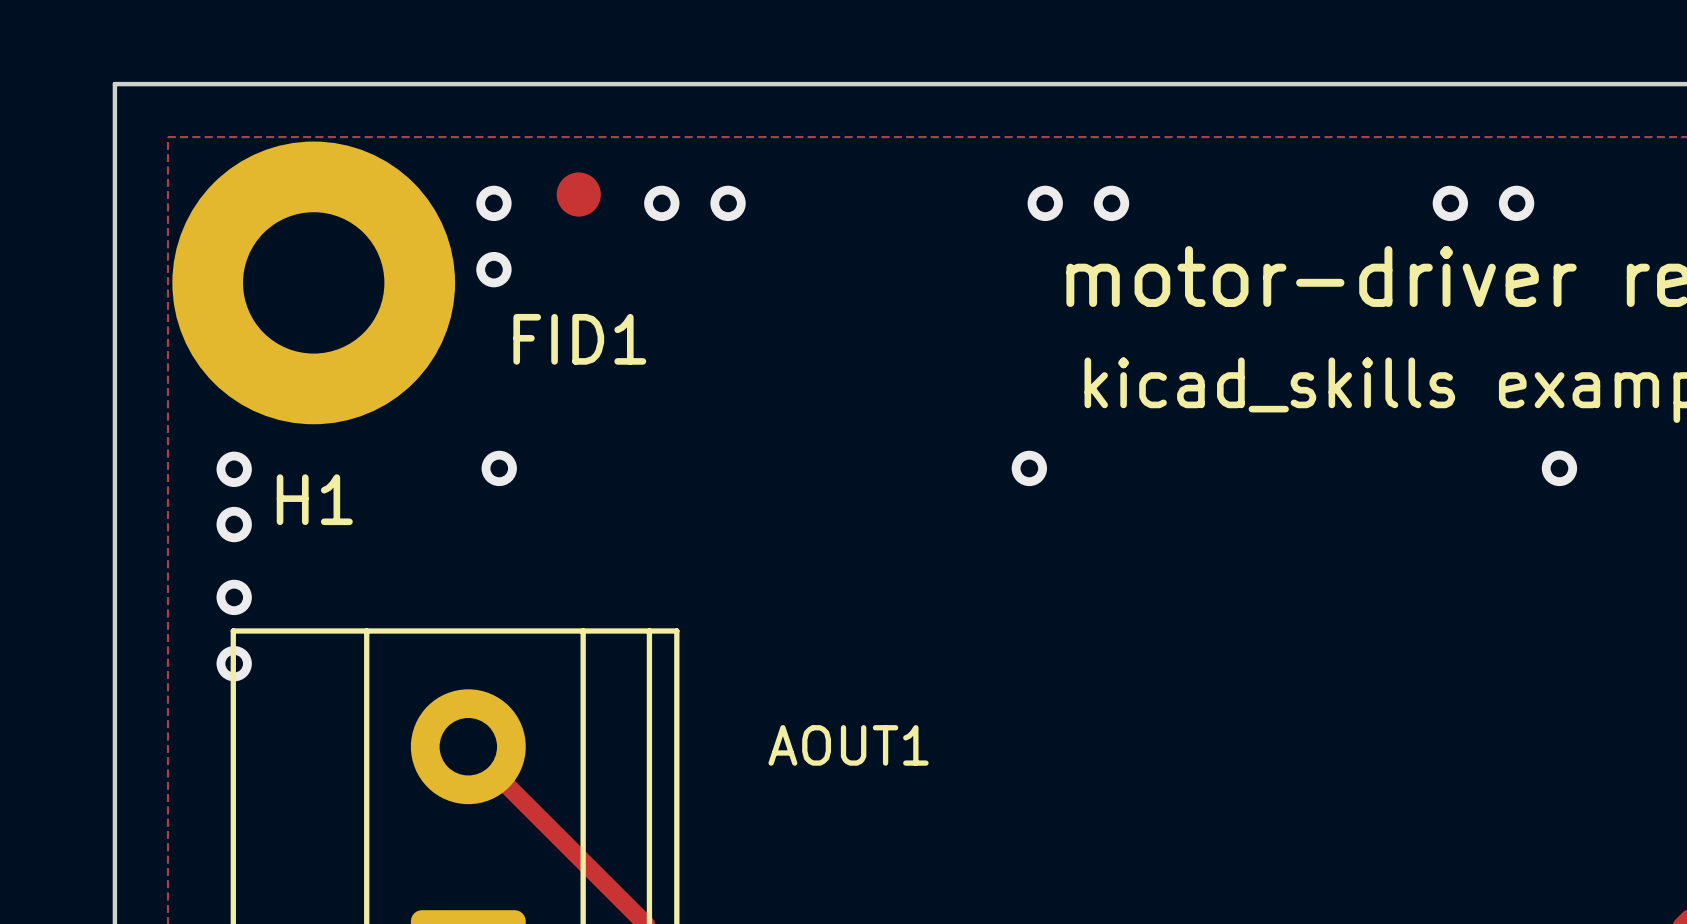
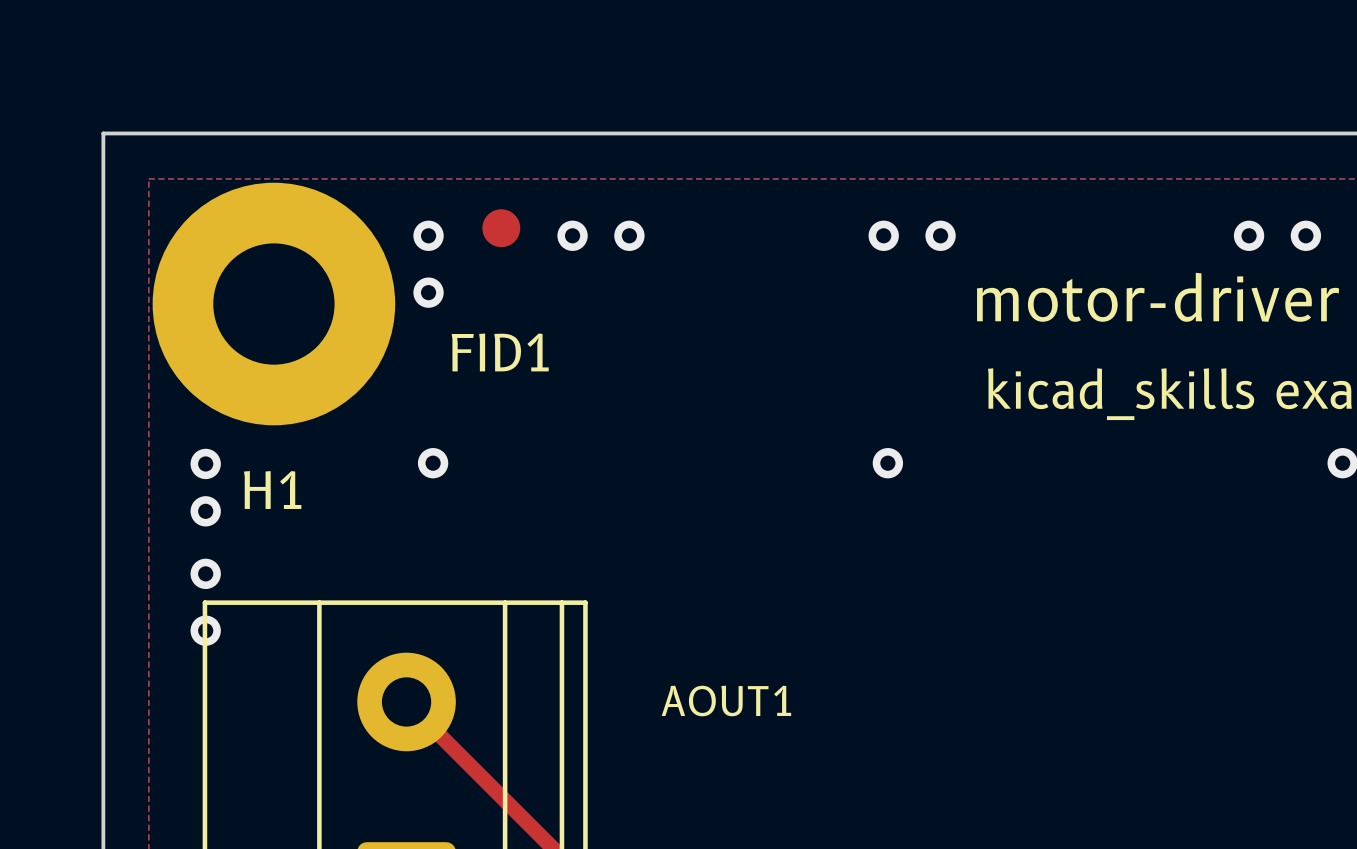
via position: (1045, 203) -> (883, 235)
via position: (1111, 203) -> (940, 235)

